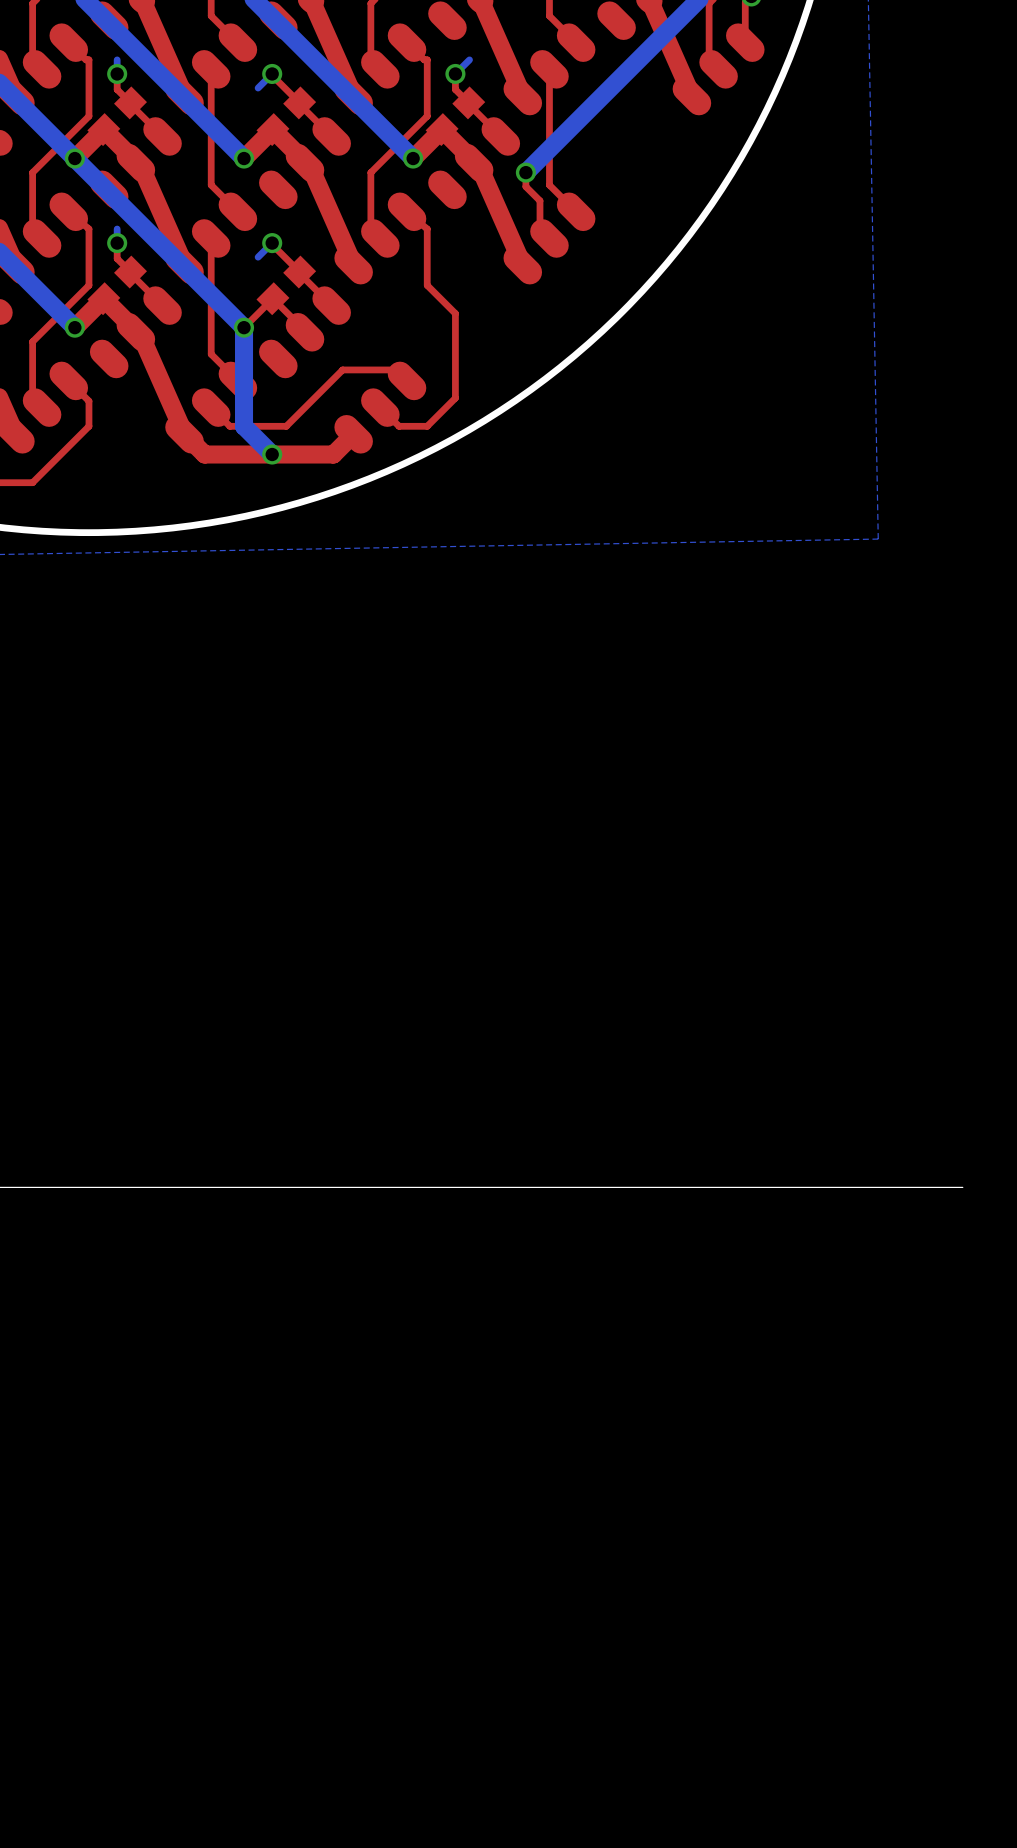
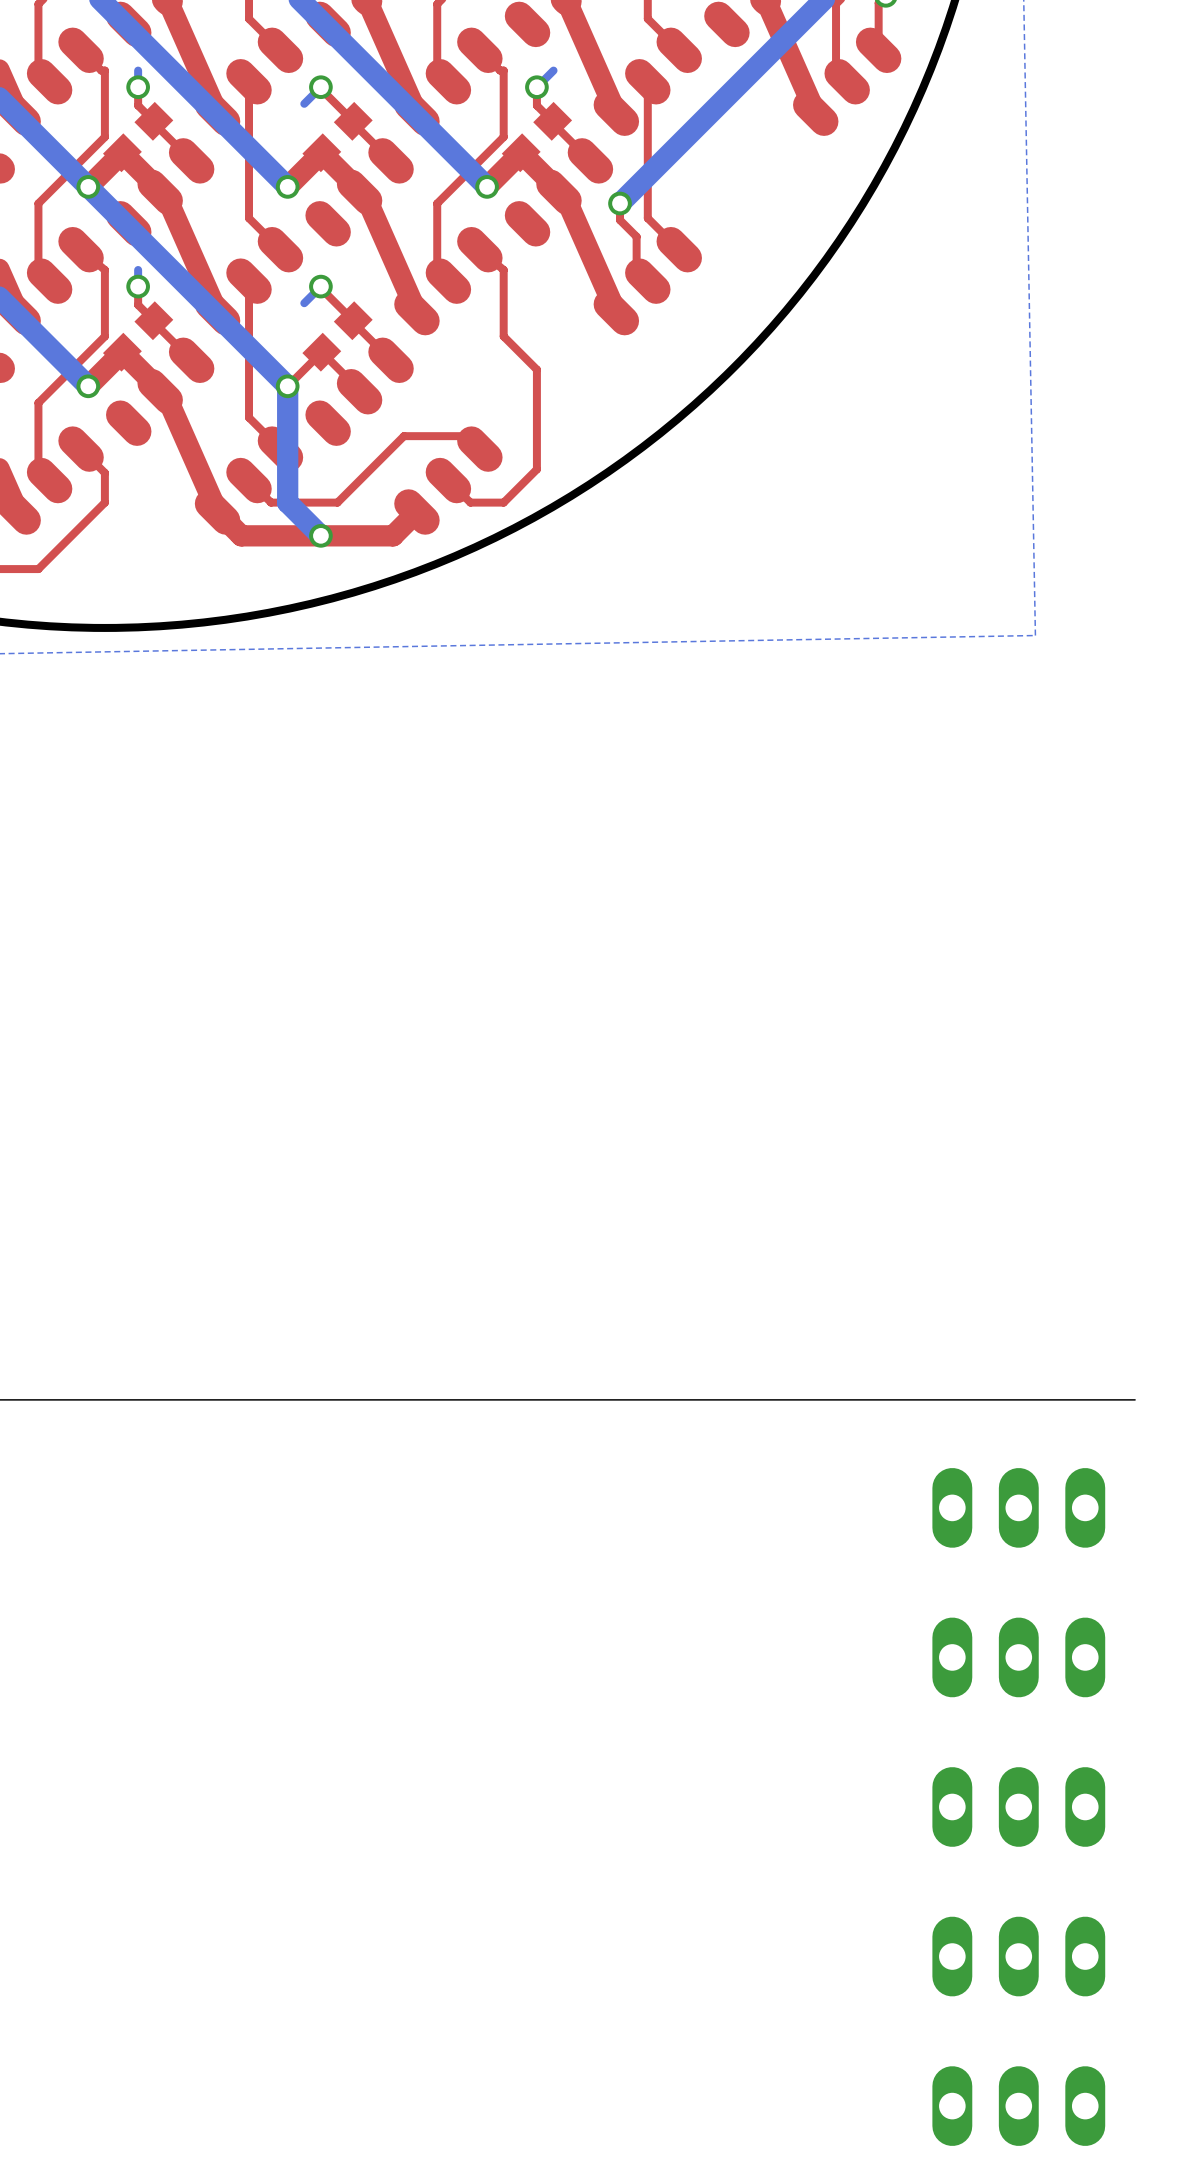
part: none -> (1018, 1507)
part: none -> (1018, 1657)
part: none -> (1018, 1806)
part: none -> (1018, 1956)
part: none -> (1018, 2106)

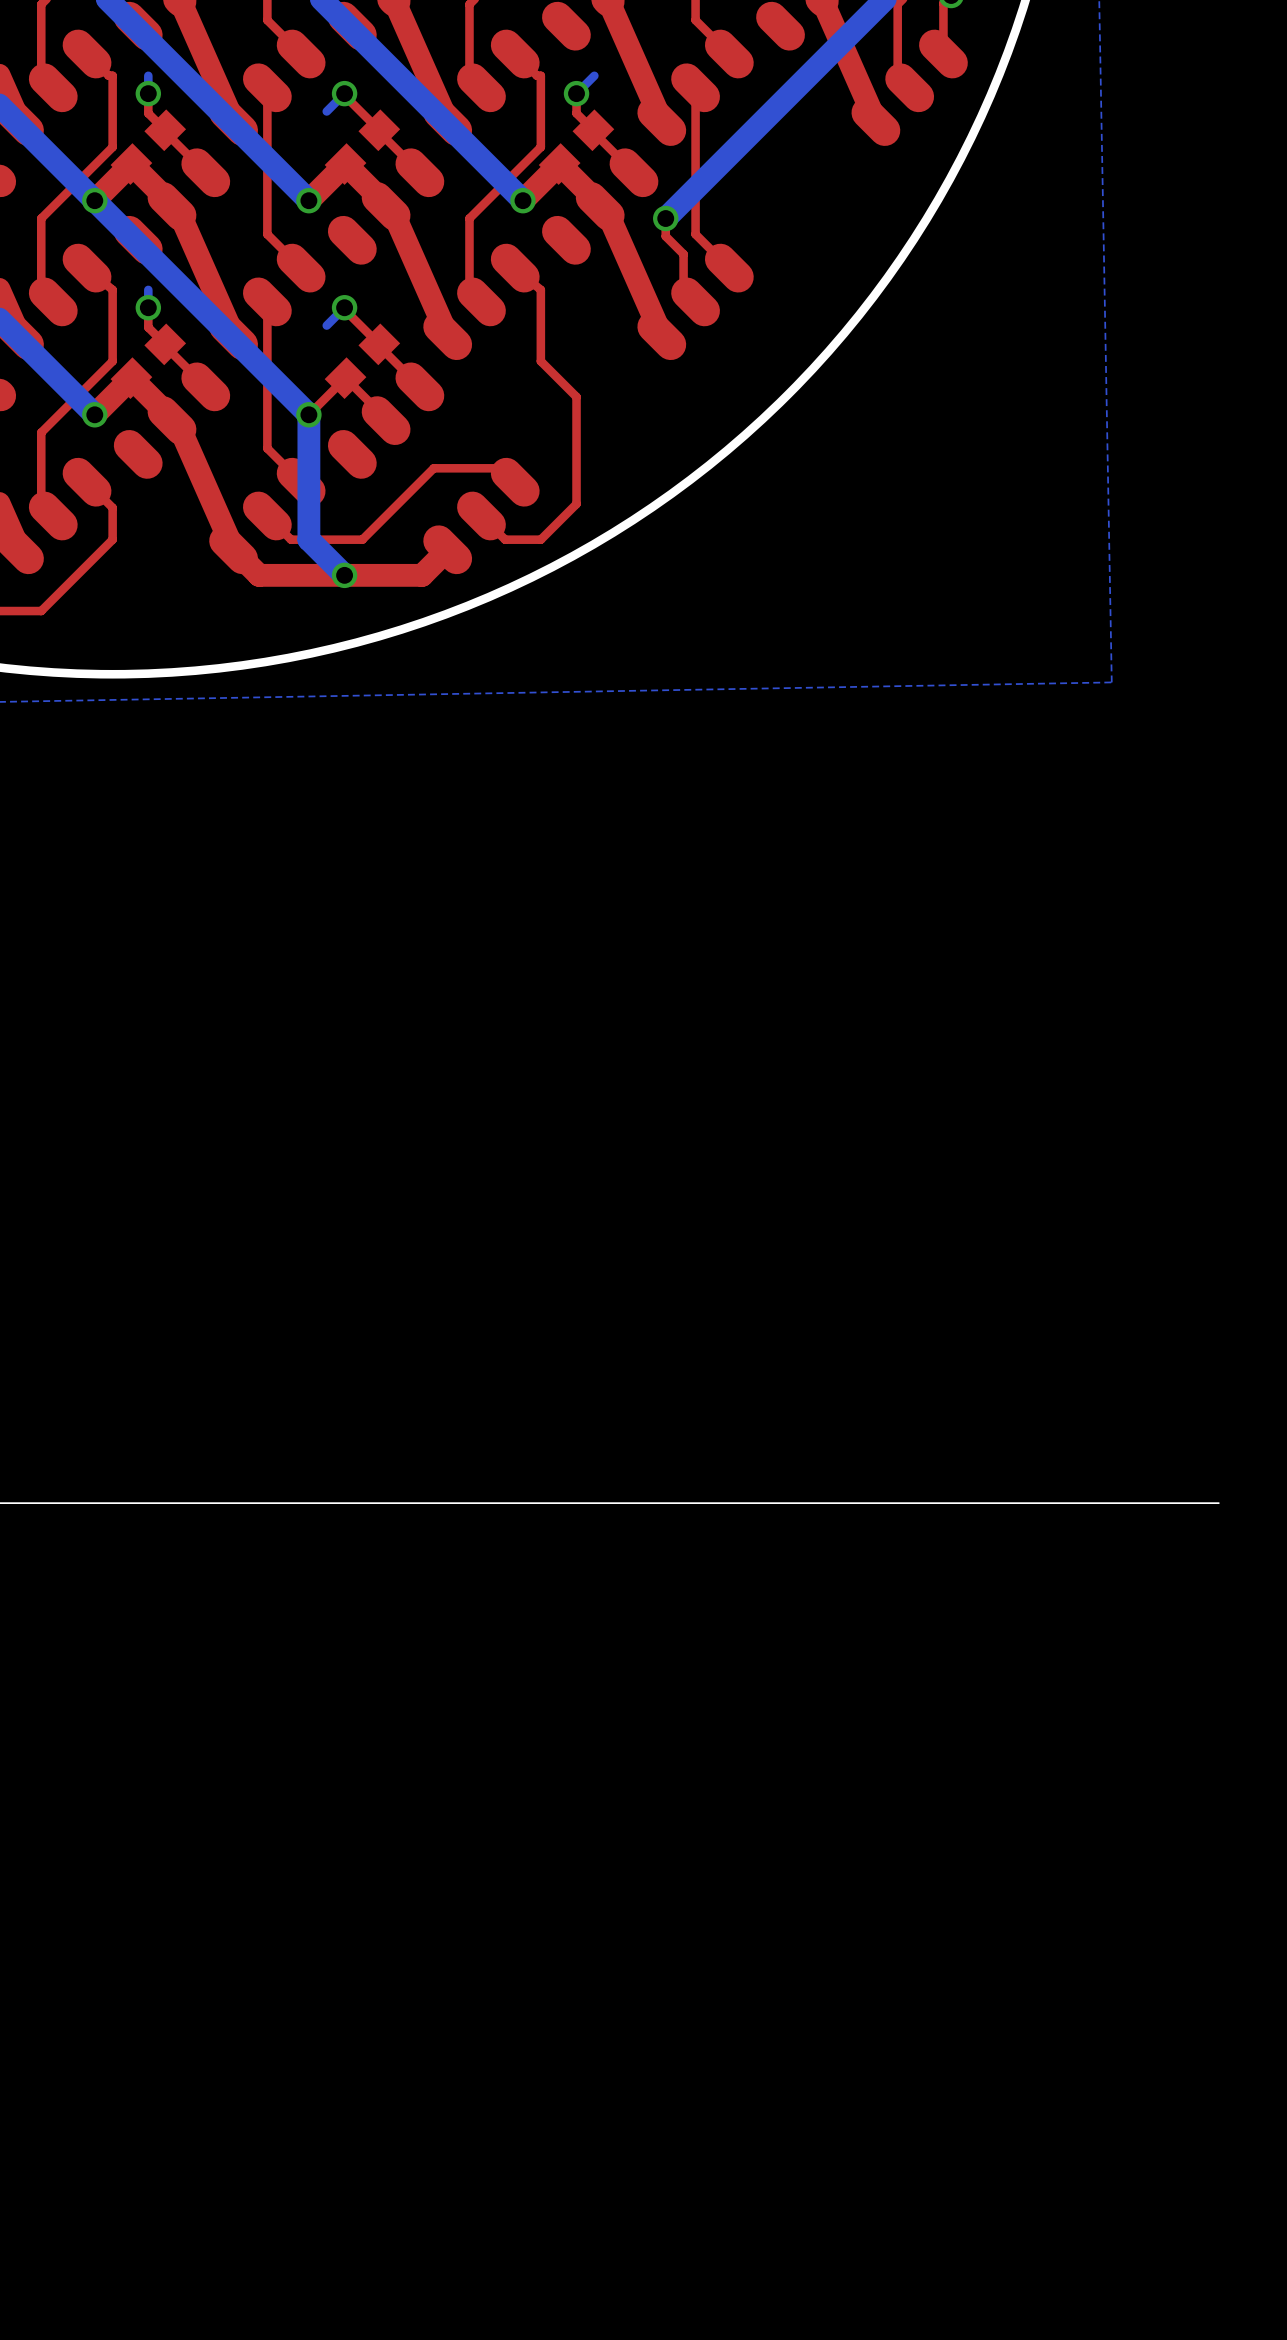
part: (1018, 1507) -> none
part: (1018, 1657) -> none
part: (1018, 1806) -> none
part: (1018, 1956) -> none
part: (1018, 2106) -> none

